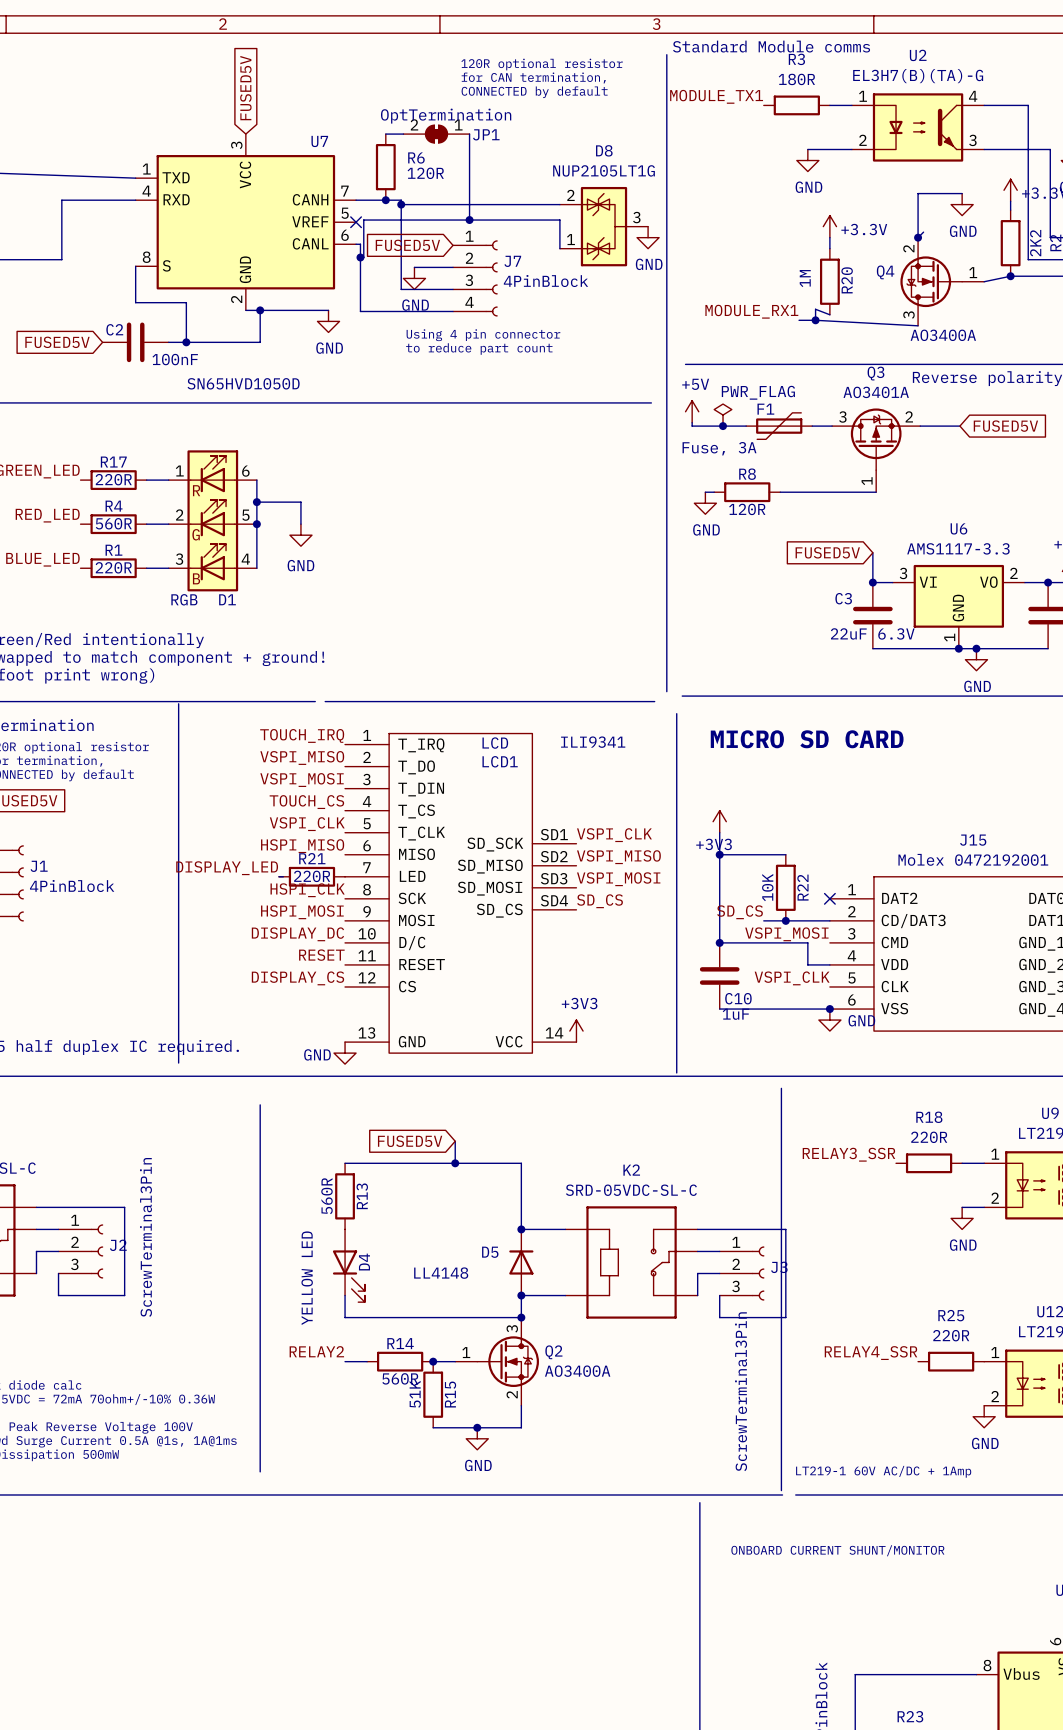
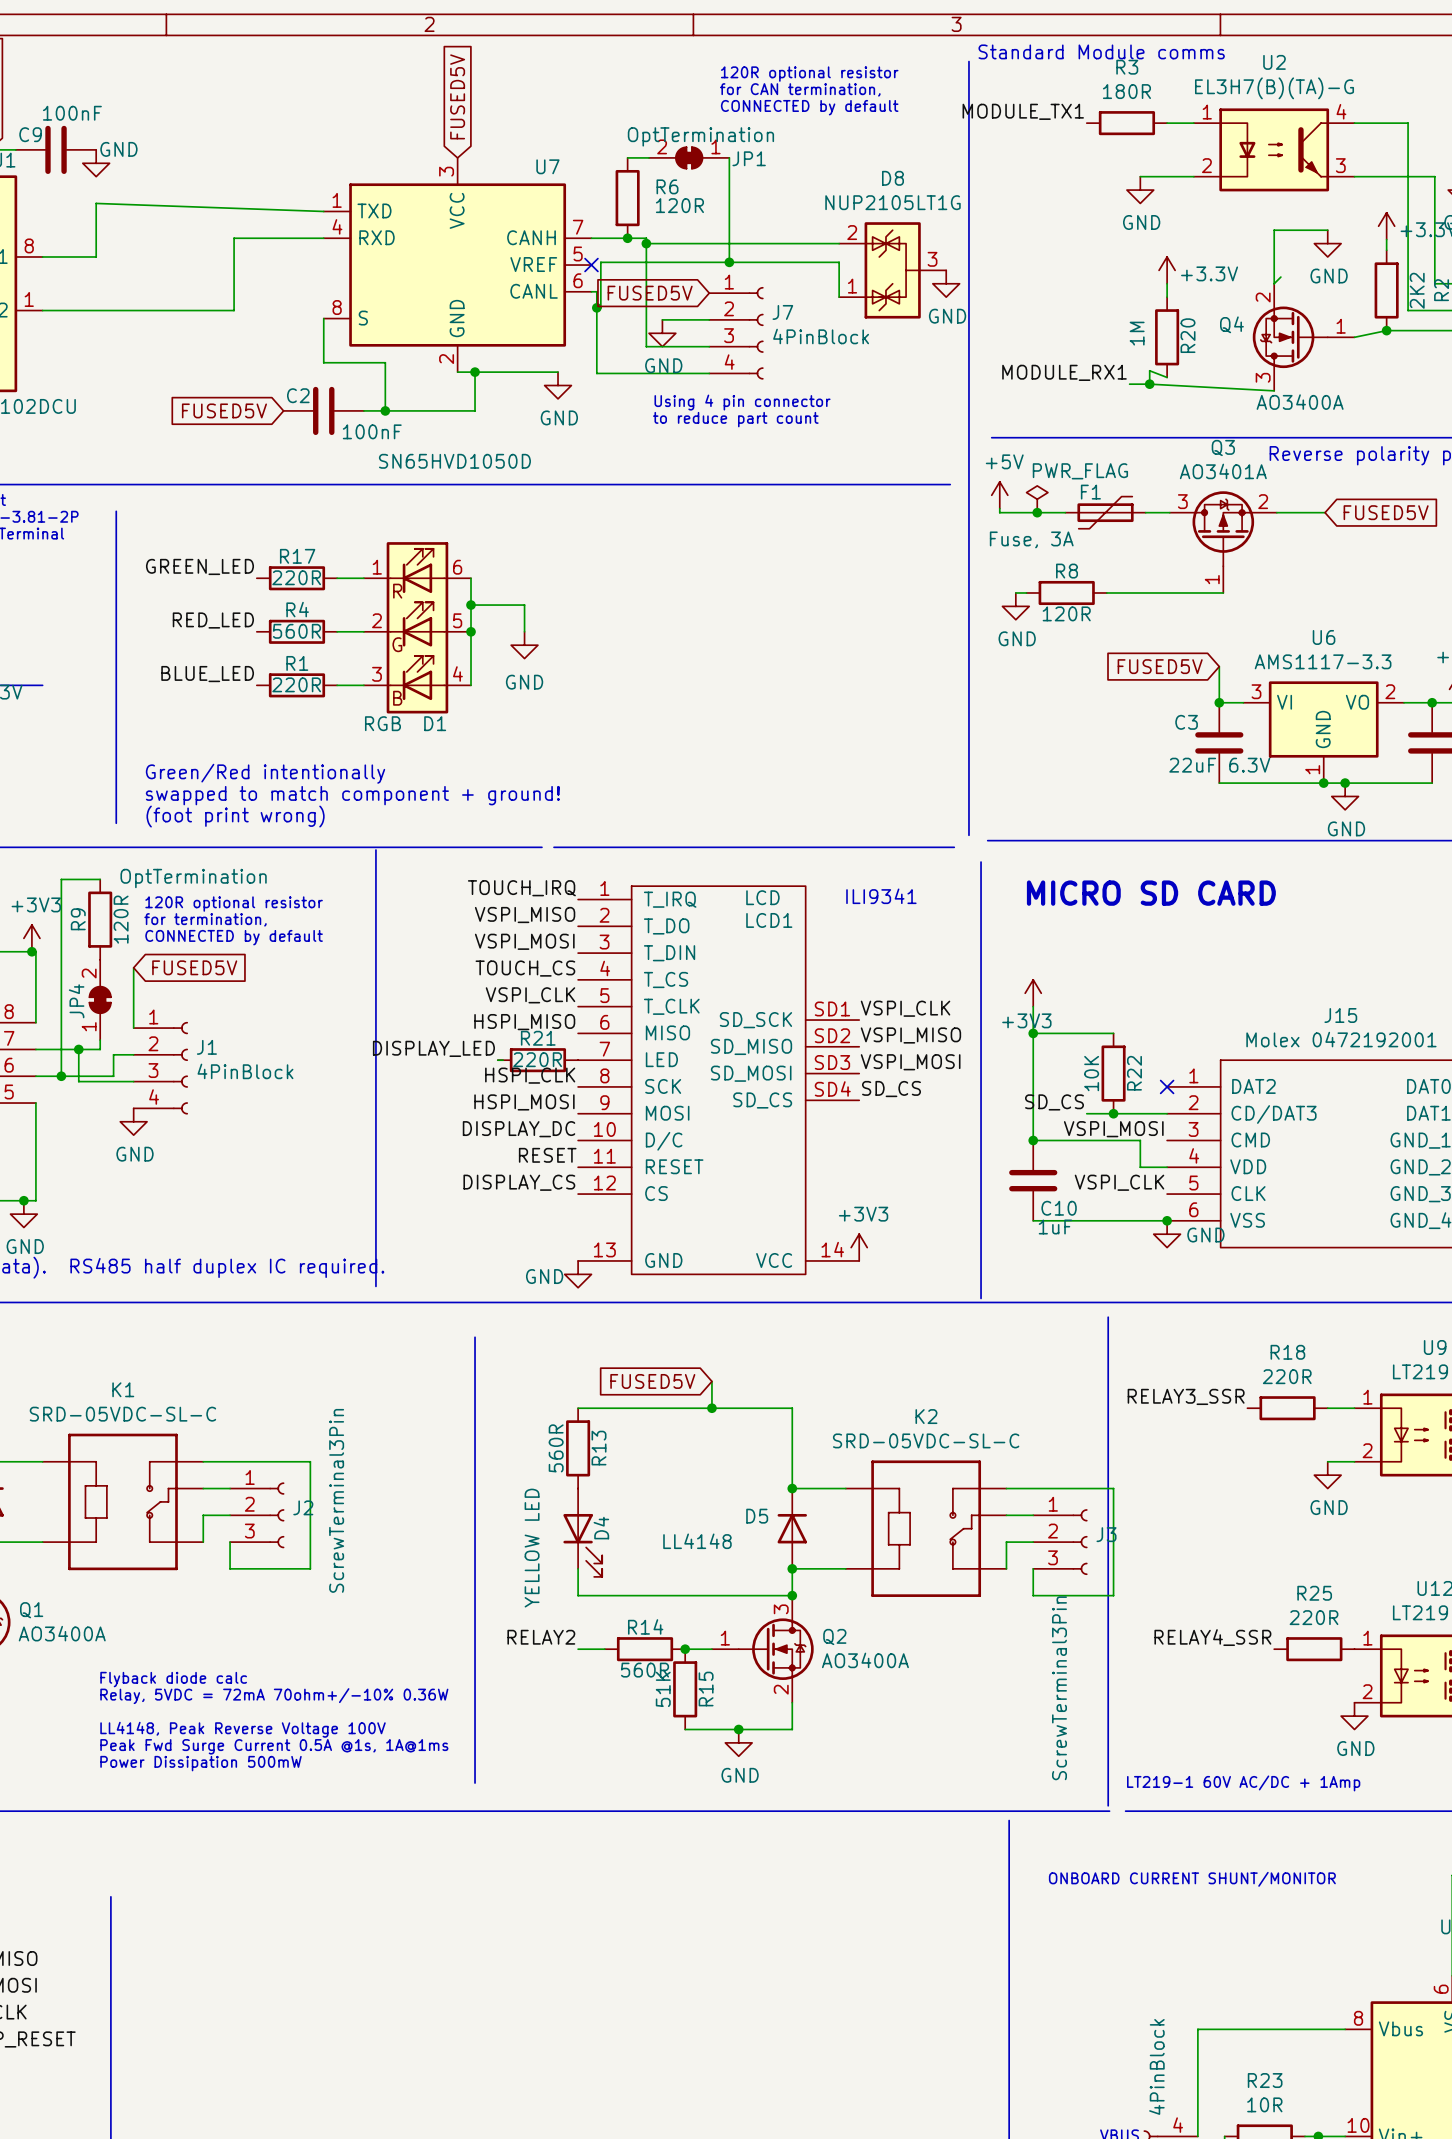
junction: (918, 237) -> none

